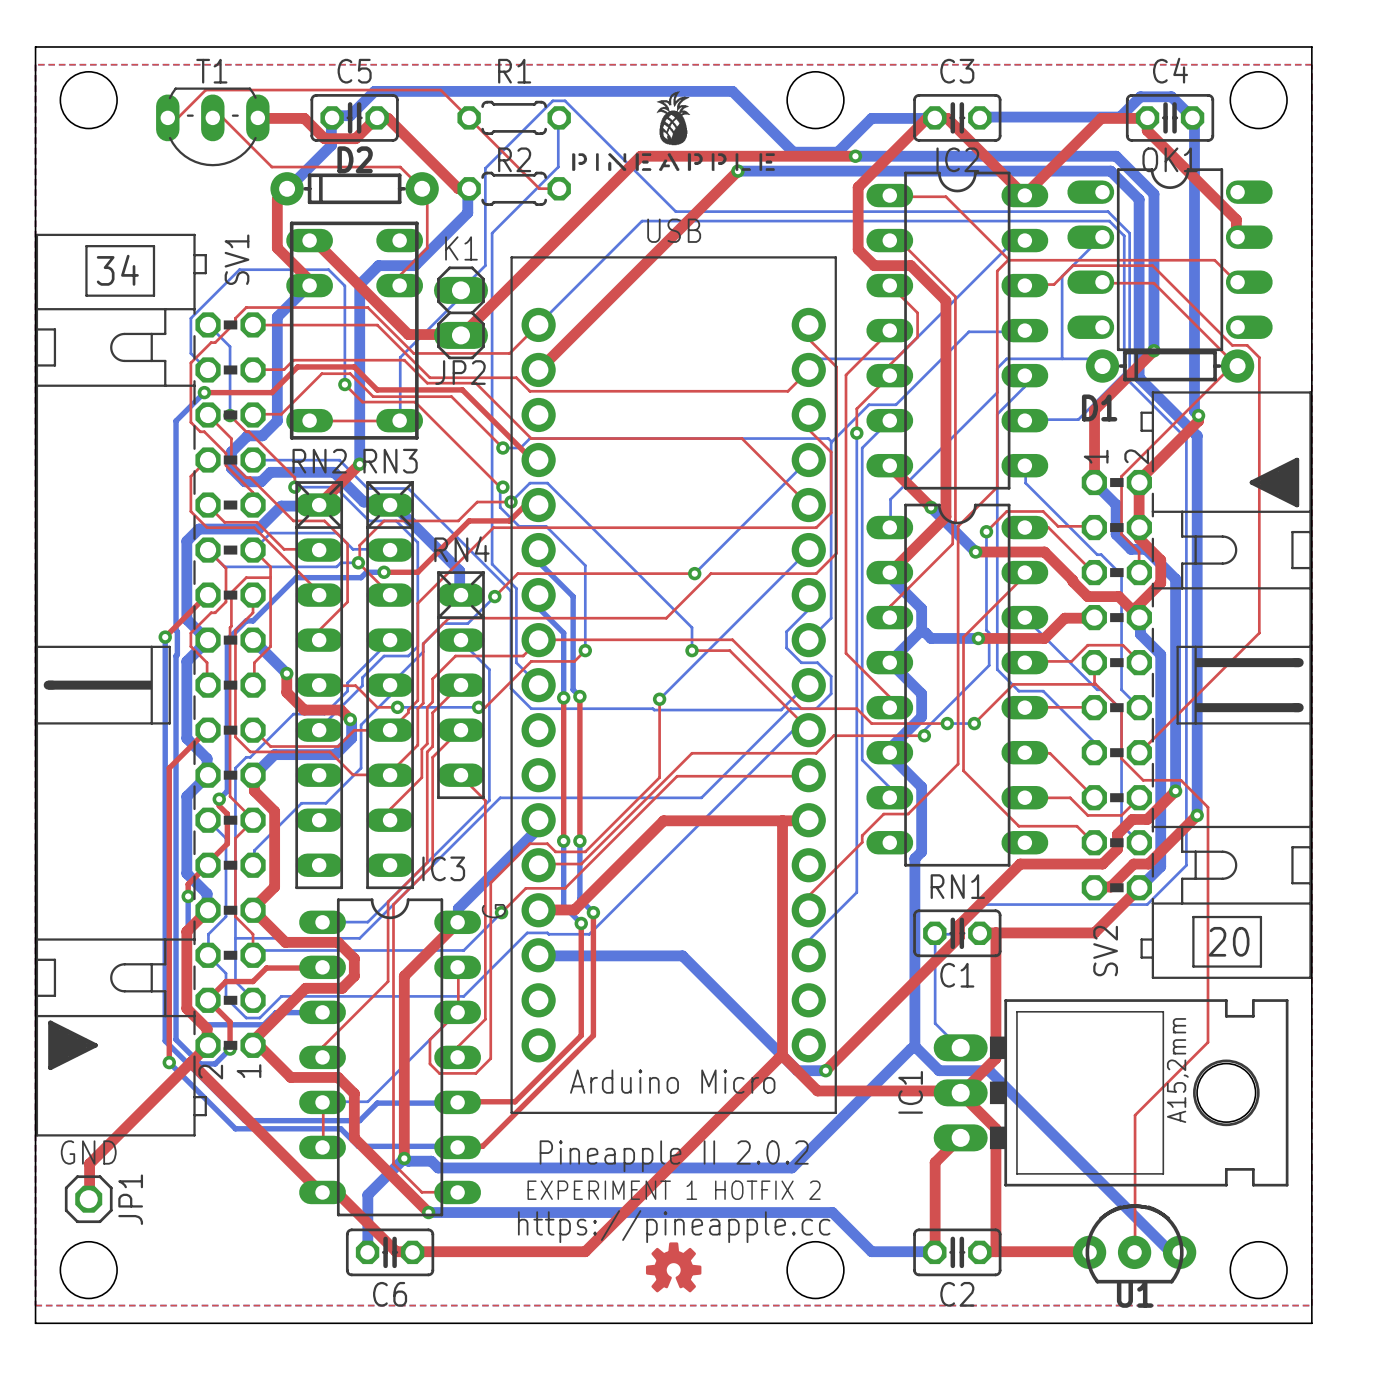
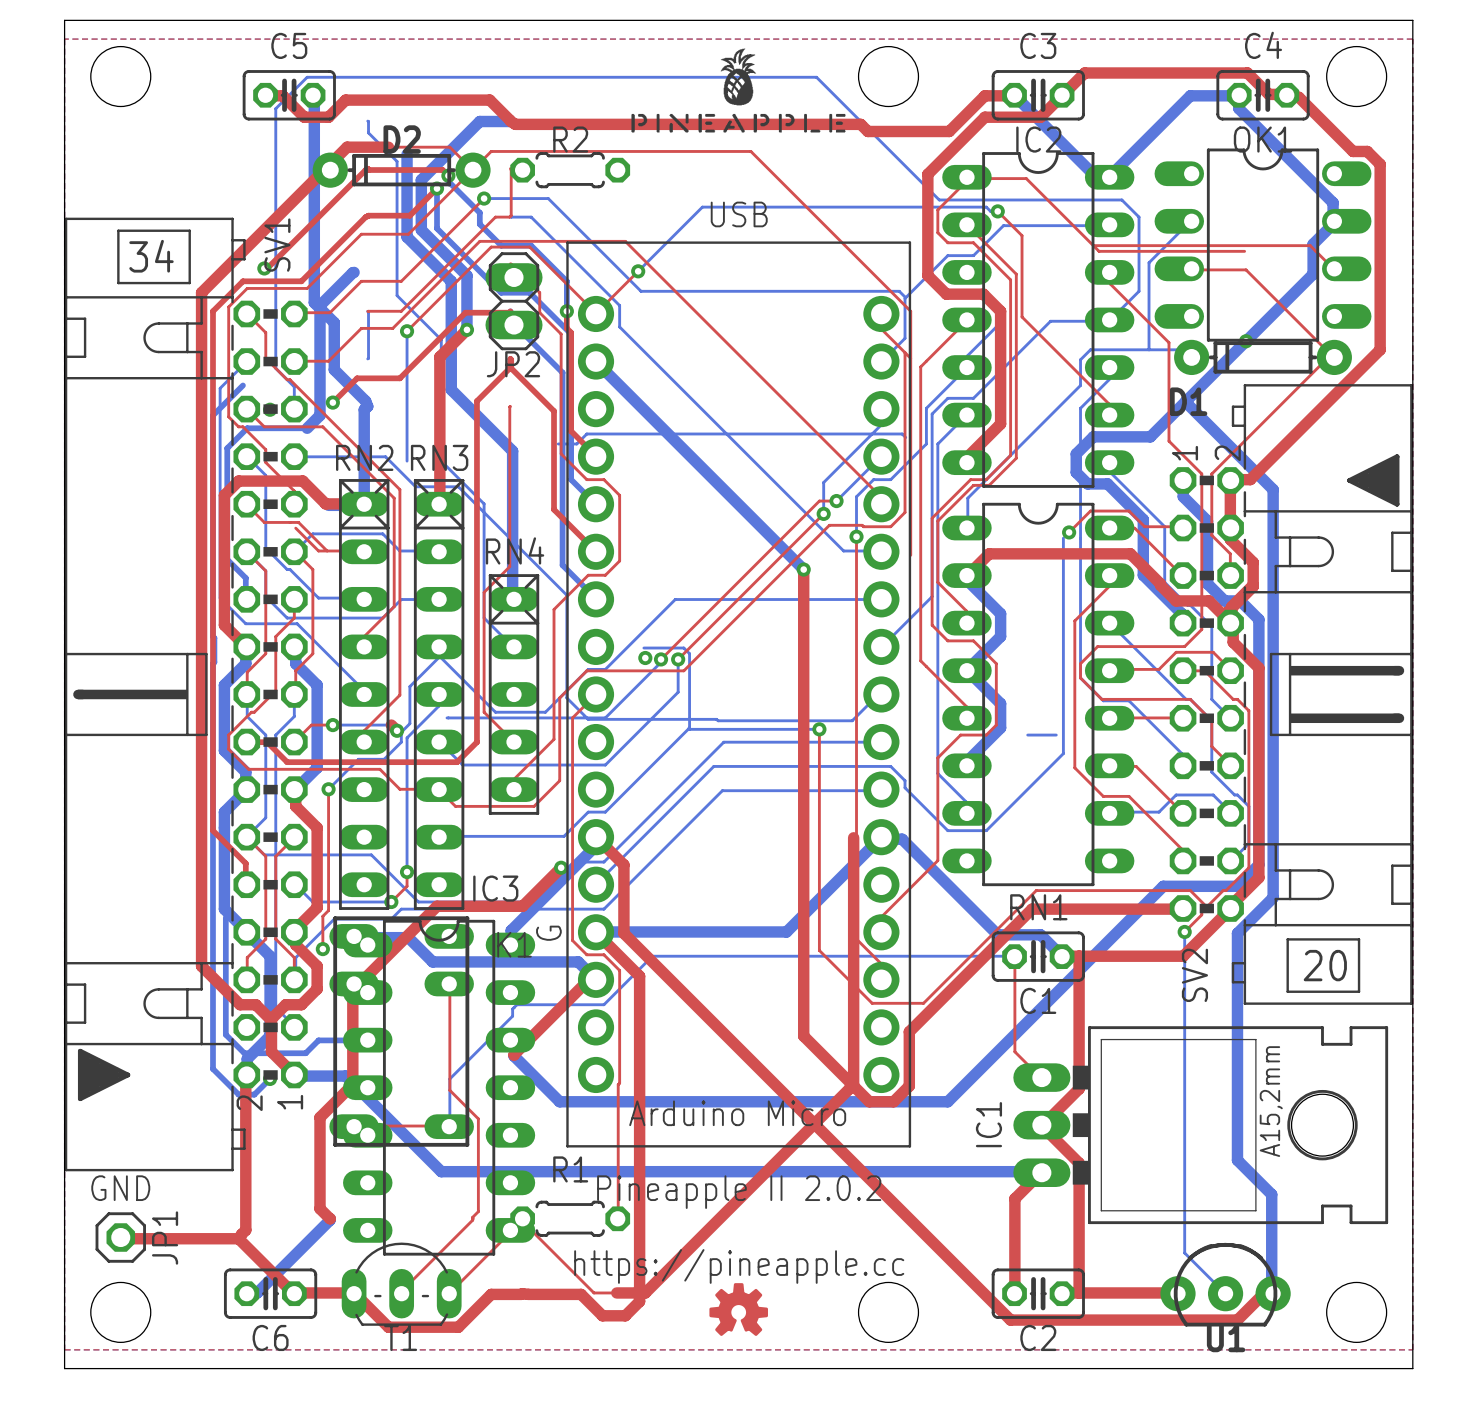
bottom track: (552, 100) (485, 168) (485, 265) (459, 291) (459, 298) (400, 357) (399, 420) -> (611, 77) (307, 77) (275, 108) (275, 368) (294, 386) (294, 409)
bottom track: (565, 100) (675, 211) (1108, 211) (1129, 233) (1129, 381) (1186, 438) (1186, 865) (1147, 904) (985, 904) (955, 934) (934, 933) (935, 1023) (960, 1047) -> (623, 77) (816, 77) (939, 199) (1121, 199) (1139, 217) (1139, 291) (1109, 319)
top track: (167, 117) (178, 117) (205, 90) (440, 90) (539, 188) (559, 188) -> none
top track: (212, 117) (223, 118) (271, 167) (302, 167) -> (294, 1074) (271, 1051) (271, 1020) (255, 1004) (240, 1004) (201, 966) (201, 292) (347, 147)
top track: none -> (265, 95) (282, 95) (304, 117) (328, 117) (345, 100) (489, 100) (515, 124) (860, 124) (867, 131) (949, 131) (984, 95) (1014, 95)
top track: (257, 117) (304, 118) (324, 138) (355, 138) (375, 118) (388, 118) (458, 188) (469, 188) -> none
bottom track: none -> (313, 95) (314, 302) (334, 322) (334, 369) (365, 401) (367, 406) (364, 409) (364, 503)
C5 position: (354, 117) -> (289, 95)
R1 position: (514, 117) -> (570, 1218)
bottom track: (559, 117) (558, 167) (492, 233) (492, 564) (516, 588) (516, 662) (538, 685) -> none
bottom track: (934, 117) (871, 118) (837, 152) (793, 152) (732, 91) (374, 91) (350, 115) (336, 115) (331, 118) (331, 145) (287, 188) -> (1014, 95) (1096, 177) (1109, 177) (1190, 95) (1239, 95) (1238, 108) (1333, 202) (1334, 221) (1313, 244) (1313, 274) (1150, 436) (1093, 436) (1076, 453) (1076, 472) (1087, 483) (1107, 483) (1143, 519) (1143, 575) (1181, 613) (1183, 623)
bottom track: (979, 117) (1120, 117) (1140, 96) (1171, 96) (1192, 117) (1194, 122) (1194, 411) (1198, 415) -> none
T1 rotation: 0° (212, 126) -> 180° (401, 1284)
T1 position: (212, 126) -> (401, 1284)
drawing position: (673, 131) -> (738, 90)
top track: (906, 138) (925, 119) (947, 118) (1024, 195) (1101, 118) (1147, 117) (1147, 130) (1236, 219) (1237, 237) -> (984, 117) (1040, 117) (1084, 72) (1247, 72) (1268, 94) (1285, 94) (1291, 97) (1298, 97) (1353, 151) (1367, 151) (1380, 164) (1380, 349) (1250, 479) (1230, 480)
bottom track: none -> (510, 121) (479, 121) (421, 180) (421, 229) (466, 275) (466, 329)
top track: (855, 156) (640, 156) (460, 335) (408, 334) (315, 241) (309, 240) -> none
bottom track: (855, 156) (1116, 156) (1153, 194) (1153, 350) -> none
via: (855, 156) -> none
top track width: thin (302, 167) (342, 167) -> thick (347, 147) (388, 147)
top track: (737, 171) (538, 369) -> none
bottom track: (737, 171) (1110, 171) (1139, 199) (1139, 377) (1197, 435) (1197, 815) -> none
via: (737, 171) -> none
bottom track: none -> (407, 154) (407, 237) (451, 281) (451, 389) (512, 451) (512, 573)
top track: none -> (510, 168) (511, 215) (495, 217) (401, 311) (367, 311)
top track: (858, 187) (858, 249) (874, 265) (910, 265) (945, 300) (945, 516) (910, 552) -> (933, 168) (927, 174) (927, 275) (946, 294) (983, 294) (1000, 311) (1000, 424) (967, 456) (966, 462)
top track: (287, 188) (277, 199) (277, 248) (308, 279) (309, 285) -> none
top track: (422, 188) (427, 194) (427, 248) (400, 275) (399, 285) -> none
bottom track: (469, 188) (467, 212) (415, 265) (378, 265) (359, 284) (359, 341) -> none
top track: none -> (448, 175) (442, 170) (367, 168) (267, 268) (264, 268)
bottom track: none -> (448, 175) (448, 181) (479, 212) (479, 224) (501, 245) (531, 245) (566, 281) (566, 311)
via: none -> (448, 175)
top track: none -> (437, 188) (409, 215) (365, 217) (301, 281) (242, 281) (212, 311) (212, 830) (245, 863) (246, 884)
bottom track: none -> (437, 188) (437, 228) (501, 292) (529, 292) (571, 334) (571, 479) (596, 504)
via: none -> (437, 188)
bottom track: none -> (484, 198) (548, 198) (641, 291) (899, 291) (905, 297)
via: none -> (484, 198)
bottom track: (639, 223) (642, 221) (1109, 221) (1124, 235) (1124, 373) (1078, 419) (1024, 420) -> (702, 207) (986, 207) (990, 211) (997, 211)
top track: none -> (997, 211) (1022, 235) (1022, 316) (1109, 404) (1109, 415)
via: none -> (997, 211)
top track: (890, 241) (900, 241) (955, 296) (955, 520) (952, 523) (952, 543) (890, 606) (889, 617) -> (967, 225) (1016, 274) (1016, 458) (989, 485) (973, 485) (937, 521) (937, 582) (966, 610) (966, 623)
bottom track: (1013, 241) (917, 337) -> (1097, 225) (1003, 225) (973, 255) (947, 255) (905, 298) (905, 338) (893, 349)
top track: (1008, 259) (997, 271) (997, 487) (958, 526) (958, 764) (908, 814) (883, 814) (862, 835) -> none
top track: (1072, 265) (1054, 284) (1024, 285) -> (1160, 251) (1099, 251) (1093, 245)
top track: (1152, 265) (1232, 345) (1247, 345) (1259, 357) (1259, 633) (1139, 752) -> (1211, 746) (1230, 765)
via: none -> (264, 268)
top track: none -> (638, 271) (596, 313) (529, 247) (491, 247) (407, 331)
bottom track: (578, 284) (538, 324) -> none
via: none -> (638, 271)
top track: (889, 285) (917, 312) (917, 337) (890, 364) (890, 375) (856, 408) (856, 433) -> none
top track: none -> (1109, 272) (1110, 284) (1168, 342) (1168, 441) (1201, 473) (1201, 629) (1184, 646) (1097, 646) (1080, 663) (1080, 677) (1101, 699) (1190, 699)
bottom track: none -> (367, 311) (367, 358)
top track: none -> (510, 311) (465, 312) (399, 378) (357, 378) (332, 402)
via: none -> (566, 311)
top track: none -> (246, 313) (265, 332) (265, 358) (287, 379) (290, 379) (399, 489) (399, 695) (364, 730) (364, 742)
bottom track: (208, 324) (230, 346) (230, 415) -> none
top track: (253, 324) (377, 325) (429, 377) (516, 377) (529, 391) (787, 391) (808, 369) -> (294, 313) (329, 312) (361, 281) (401, 281) (484, 198)
top track: (538, 324) (509, 353) (413, 353) (367, 307) (246, 307) (235, 318) (235, 322) (215, 342) (211, 342) (190, 362) -> (910, 358) (910, 311) (750, 151) (491, 151) (408, 234) (361, 234) (307, 288) (247, 288) (228, 307) (228, 354)
K1 position: (354, 330) -> (401, 1031)
top track: none -> (466, 329) (439, 356) (439, 504)
via: none -> (466, 329)
bottom track width: thick (359, 341) (359, 464) -> thin (407, 331) (407, 461)
via: none -> (407, 331)
top track: (1153, 350) (1094, 410) (1094, 482) -> none
bottom track: (820, 358) (895, 358) -> (856, 536) (856, 496) (873, 479) (890, 479) (926, 443) (926, 408) (967, 366) (967, 355) (973, 349)
bottom track: (208, 369) (190, 353) (190, 318) (239, 269) (328, 269) (344, 285) (344, 384) -> (246, 361) (220, 388) (220, 598) (245, 623) (297, 623) (362, 689) (364, 694)
top track: (284, 369) (293, 360) (404, 360) (427, 383) (475, 383) (531, 438) (741, 438) (808, 504) -> (327, 361) (361, 328) (392, 328) (479, 241) (625, 241) (880, 496) (880, 503)
bottom track: none -> (596, 361) (803, 569)
top track: (344, 384) (362, 402) (415, 402) (500, 487) (502, 487) -> none
via: (344, 384) -> none
top track: (204, 392) (271, 392) (297, 366) (354, 366) (377, 389) (462, 389) (531, 458) (538, 458) -> (566, 311) (566, 328) (571, 332) (571, 431) (595, 455)
via: (204, 392) -> none
bottom track: (871, 404) (868, 404) (831, 442) (831, 618) -> (947, 398) (932, 414) (932, 428)
via: none -> (332, 402)
top track: (253, 414) (281, 414) (321, 373) (350, 373) (373, 396) (451, 396) (502, 448) -> none
top track: (808, 414) (809, 430) (831, 452) -> (905, 352) (905, 448)
bottom track: none -> (881, 409) (880, 425) (823, 482) (823, 513)
top track: (230, 415) (246, 431) -> (264, 426) (287, 426)
top track: (1198, 415) (1198, 420) (1141, 477) (1139, 482) -> none
via: (1198, 415) -> none
top track: (309, 420) (399, 420) -> none
top track: (224, 431) (231, 438) (231, 462) (246, 477) (250, 477) (293, 520) (324, 520) (347, 543) -> (290, 426) (322, 426) (394, 498) (394, 545)
top track: (248, 431) (294, 477) (294, 487) -> none
bottom track: (265, 433) (262, 435) (247, 435) (231, 452) (231, 468) (244, 481) (261, 481) (270, 472) (334, 472) (363, 502) (385, 502) (390, 506) (394, 506) (459, 570) -> (307, 428) (247, 428) (227, 448) (227, 559) (245, 578) (246, 599)
via: (856, 433) -> none
via: (502, 448) -> none
top track: (208, 460) (190, 476) (190, 511) (207, 527) (254, 527) -> none
top track: (359, 464) (319, 504) -> (246, 646) (224, 625) (224, 495) (238, 481) (302, 481) (325, 503) (364, 504)
via: (359, 464) -> none
top track: (889, 465) (931, 507) -> none
bottom track: (1025, 475) (1025, 483) (1097, 554) (1101, 554) (1121, 574) (1121, 620) -> (1110, 472) (1164, 526) (1164, 582) (1211, 626)
bottom track: (1094, 483) (1116, 504) (1116, 534) (1131, 549) (1145, 549) (1175, 579) (1175, 791) -> (1183, 481) (1183, 496) (1207, 521) (1207, 583) (1224, 600) (1240, 600) (1258, 619) (1258, 864) (1237, 886) (1163, 886) (947, 1101) (899, 1101)
bottom track: (294, 487) (335, 487) (369, 520) (396, 520) (417, 542) (417, 646) (408, 656) (384, 656) -> (439, 656) (432, 663)
via: (294, 487) -> none
bottom track: (502, 487) (500, 489) (500, 507) (519, 526) (546, 526) (585, 565) (585, 650) -> none
via: (502, 487) -> none
top track: (511, 502) (477, 502) (458, 520) (384, 520) (359, 545) (358, 562) (390, 595) -> none
bottom track: (511, 502) (529, 483) (547, 483) (692, 627) (692, 650) -> none
via: (511, 502) -> none
top track: none -> (836, 501) (819, 501) (661, 659)
bottom track: (766, 502) (694, 573) -> none
via: none -> (836, 501)
top track: (538, 505) (524, 506) (509, 520) (469, 520) (417, 572) (384, 572) -> none
bottom track: (281, 506) (258, 529) (198, 529) (186, 541) (186, 619) (208, 640) (186, 661) (186, 676) -> (246, 646) (245, 663) (224, 685)
bottom track: (931, 507) (975, 552) -> none
via: (931, 507) -> none
top track: none -> (823, 513) (678, 659)
via: none -> (823, 513)
top track: (817, 526) (493, 527) (456, 564) -> (510, 406) (509, 566)
bottom track: (986, 531) (986, 630) (989, 633) (989, 665) (924, 730) (924, 735) -> none
top track: none -> (856, 536) (856, 939) (880, 963) (881, 979)
via: none -> (856, 536)
bottom track: none -> (1063, 538) (1063, 753) (986, 830) (947, 830) (905, 787) (905, 780) (890, 766) (713, 766) (596, 884)
top track: (275, 549) (317, 591) (319, 595) -> (318, 550) (327, 550)
bottom track: (538, 550) (539, 562) (573, 596) (573, 689) (579, 696) -> none
bottom track: (808, 550) (659, 699) -> (881, 551) (843, 550) (619, 326) (619, 305) (531, 217) (510, 216)
top track: none -> (989, 553) (1057, 553)
via: (975, 552) -> none
top track: (836, 553) (816, 573) (710, 573) -> (890, 526) (829, 525) (778, 576)
bottom track: (358, 562) (340, 562) (336, 566) (248, 566) -> (364, 599) (318, 598) (290, 569)
via: (358, 562) -> none
bottom track: (224, 566) (246, 566) -> (246, 456) (265, 475) (265, 548) (287, 569)
bottom track: none -> (264, 569) (265, 596) (287, 618) (382, 618) (401, 599) (439, 599)
top track: none -> (803, 569) (803, 1036) (853, 1086)
bottom track: (384, 572) (366, 572) (361, 577) (296, 577) (253, 620) (246, 620) (227, 639) (227, 791) (219, 799) -> none
via: (384, 572) -> none
top track: (694, 573) (517, 573) (494, 596) -> none
via position: (694, 573) -> (803, 569)
top track: (1024, 576) (963, 637) (963, 770) (1018, 826) (1076, 826) (1093, 842) -> (1109, 579) (1109, 586) (1074, 620) (1074, 767) (1103, 796) (1129, 796) (1181, 849) (1181, 860)
top track: (270, 577) (246, 577) (231, 592) (230, 796) (253, 820) -> none
top track: none -> (1253, 585) (1231, 606) (1230, 623) (1233, 628) (1233, 642) (1258, 667) (1258, 877) (1233, 903) (1230, 908)
top track: (432, 588) (417, 603) (417, 700) (390, 730) (354, 730) (338, 746) (270, 746) (253, 730) -> (484, 592) (484, 687)
bottom track: (856, 592) (856, 892) (809, 939) (808, 955) -> (932, 596) (905, 623)
top track: (208, 595) (165, 637) -> none
bottom track: (538, 595) (539, 608) (563, 633) (563, 697) -> (596, 599) (562, 565) (562, 372) (511, 321) (510, 311)
bottom track: (808, 595) (808, 610) (786, 631) (786, 647) (801, 662) (817, 662) (831, 676) (831, 693) (816, 708) (790, 708) (701, 797) (500, 797) (359, 938) (235, 938) -> (880, 599) (675, 599) (605, 669) (588, 669) (545, 712) (495, 712) (439, 656)
bottom track: (494, 596) (467, 623) (443, 623) (423, 643) (423, 651) (390, 685) -> none
via: (494, 596) -> none
top track: (226, 601) (215, 612) (211, 612) (190, 633) (190, 646) (207, 662) (208, 685) -> (265, 606) (265, 653) (247, 672) (246, 694)
top track: (1094, 617) (1064, 618) (1044, 638) (978, 638) -> none
bottom track: (1139, 617) (1140, 634) (1160, 654) (1160, 866) (1139, 887) -> none
top track: (666, 618) (448, 618) (423, 643) (423, 703) (417, 708) (417, 745) (389, 773) (390, 775) -> none
bottom track: (921, 630) (931, 638) (978, 638) -> none
bottom track: (165, 637) (165, 1040) (244, 1120) (359, 1120) (377, 1103) (457, 1102) -> none
via: (165, 637) -> none
via: (978, 638) -> none
bottom track: (390, 640) (347, 683) (347, 691) (324, 714) -> (391, 725) (369, 725)
bottom track: (460, 640) (489, 669) (489, 800) (367, 922) (322, 922) -> (514, 646) (484, 618) (484, 503) (441, 461) (441, 339) (397, 295) (397, 161) (368, 132) (367, 121)
bottom track: (254, 641) (286, 673) -> (295, 648) (295, 663) (317, 685) (317, 767)
bottom track: none -> (643, 648) (683, 648) (689, 653) (689, 727) (605, 812) (588, 812) (564, 836) (439, 837)
top track: (585, 650) (574, 661) (529, 662) -> (730, 623) (683, 670) (586, 670)
top track: (692, 650) (729, 650) (808, 730) -> none
via: (692, 650) -> none
bottom track: none -> (661, 659) (661, 662) (605, 717) (532, 717)
via: none -> (661, 659)
bottom track: none -> (678, 659) (678, 692) (605, 765) (462, 765) (439, 742)
via: none -> (678, 659)
top track: (1094, 662) (1094, 683) (1101, 689) -> (1183, 670) (1204, 670) (1233, 699) (1237, 699) (1248, 710) (1248, 867) (1226, 890) (1223, 890) (1184, 931)
top track: (286, 673) (286, 692) (304, 710) (340, 710) (344, 714) -> none
via position: (286, 673) -> (332, 725)
top track: (432, 678) (455, 656) (523, 656) (539, 639) (732, 639) (801, 708) (856, 708) (871, 723) (883, 723) -> (937, 853) (937, 757) (960, 735)
top track: (235, 681) (235, 737) (250, 751) (330, 751) (334, 755) -> (275, 690) (228, 735) (228, 749) (248, 769) (379, 769)
top track: (1095, 683) (1013, 684) (974, 723) -> none
bottom track: none -> (246, 694) (247, 716) (265, 735) (265, 817) (246, 837)
top track: (319, 685) (355, 685) (377, 707) (397, 707) -> none
bottom track: (362, 685) (319, 730) -> (409, 695) (409, 723) (401, 732) (401, 742) (384, 759) (358, 759) (328, 789)
top track: (460, 685) (432, 712) (432, 746) (427, 751) (427, 862) (388, 901) (388, 981) (323, 1046) (322, 1057) -> none
top track: none -> (596, 694) (572, 717) (572, 940) (586, 954) (603, 954) (619, 970) (617, 1218)
top track: (504, 688) (485, 707) (478, 707) -> (559, 697) (559, 780) (534, 806) (455, 806) (439, 789)
top track: (579, 696) (579, 841) -> none
via: (579, 696) -> none
top track: (563, 697) (563, 841) -> none
via: (563, 697) -> none
top track: (659, 699) (659, 777) (585, 851) (555, 851) (547, 843) (529, 843) (490, 882) (490, 1058) (475, 1073) (439, 1073) (429, 1063) (429, 1039) (458, 1011) (457, 967) -> none
via: (659, 699) -> none
top track: (432, 701) (427, 707) (427, 743) (421, 749) (421, 777) (390, 808) (390, 820) -> (484, 712) (514, 742)
via: (397, 707) -> none
via: (478, 707) -> none
top track: none -> (332, 725) (311, 725) (294, 742)
bottom track: (293, 714) (250, 757) (246, 757) (235, 768) -> (294, 694) (294, 716) (275, 735) (275, 782)
bottom track: none -> (688, 728) (819, 729)
top track: none -> (819, 729) (819, 950) (872, 1003) (923, 1003) (1036, 890) (1190, 890) (1206, 906)
via: none -> (819, 729)
bottom track: (350, 719) (351, 738) (335, 754) (274, 754) -> none
top track: (908, 723) (947, 723) -> (986, 735) (996, 725) (996, 663) (973, 640) (947, 640) (932, 625) (932, 518) (970, 479) (986, 479) (1010, 455) (1010, 279) (973, 242) (947, 242) (937, 232) (937, 209) (967, 180) (966, 177)
via: (947, 723) -> none
via: (974, 723) -> none
bottom track: (361, 724) (361, 768) (325, 803) (301, 803) (254, 850) (253, 865) -> (408, 736) (407, 872)
top track: (208, 730) (169, 768) (169, 1062) -> (246, 742) (267, 742) (287, 762) (456, 762) (476, 742) (476, 401) (509, 368) (510, 358) (511, 368) (554, 411) (554, 509) (596, 551)
top track: (460, 730) (432, 757) (432, 865) (393, 904) (393, 1163) (421, 1192) (457, 1192) -> none
bottom track: (793, 730) (589, 934) (527, 932) (463, 996) (281, 996) (259, 1018) (246, 1018) (226, 997) (226, 973) (208, 955) (208, 934) (226, 916) (224, 837) -> (865, 742) (723, 742) (603, 862) (583, 862) (544, 902) (418, 902) (371, 854) (264, 854)
top track: (1121, 734) (1121, 758) (1143, 780) (1180, 780) (1208, 807) (1208, 1042) (1135, 1115) (1134, 1252) -> none
top track: (924, 735) (833, 735) (816, 753) (692, 753) (581, 864) (538, 865) -> none
via: (924, 735) -> none
bottom track: (889, 752) (891, 757) (921, 787) (921, 851) (914, 858) (914, 1046) -> none
bottom track: (1121, 758) (1121, 824) (1139, 842) -> (1211, 772) (1248, 806) (1248, 843) (1230, 860)
top track: none -> (328, 789) (328, 910) (322, 916) (322, 949)
via: none -> (328, 789)
top track: (460, 775) (485, 800) (485, 1019) (458, 1046) (457, 1057) -> (514, 789) (514, 779) (554, 739) (554, 609) (588, 575) (605, 575) (619, 560) (619, 495) (603, 479) (586, 479) (561, 453) (561, 334) (539, 312) (539, 292) (510, 263)
top track: (808, 775) (677, 776) (565, 888) (525, 888) (501, 912) -> none
top track: (1175, 791) (1147, 819) (1132, 819) (1117, 834) (1117, 849) (1102, 864) (1020, 864) (959, 924) (959, 936) (825, 1070) -> none
via: (1175, 791) -> none
top track: (1024, 797) (1070, 797) (1087, 815) (1121, 815) (1139, 797) -> none
bottom track: none -> (1109, 813) (1159, 812) (1176, 794) (1213, 794) (1230, 813)
top track: (219, 799) (219, 805) (227, 814) (227, 843) (188, 884) (188, 896) -> none
via: (219, 799) -> none
top track: (1197, 815) (1148, 864) (1133, 864) (1110, 887) (1094, 887) -> none
via: (1197, 815) -> none
top track: none -> (246, 837) (265, 856) (265, 939) (247, 957) (246, 979)
top track: none -> (596, 837) (623, 864) (623, 933) (1010, 1320) (1237, 1320) (1263, 1294) (1273, 1293)
top track: (808, 820) (663, 820) (574, 909) (538, 910) -> (238, 1238) (294, 1293) (352, 1292) (388, 1327) (458, 1327) (491, 1294) (581, 1294) (602, 1315) (625, 1315) (639, 1301) (639, 976) (596, 932)
bottom track: (563, 841) (563, 905) (581, 923) -> none
via: (563, 841) -> none
bottom track: (579, 841) (579, 899) (593, 912) -> none
via: (579, 841) -> none
top track: none -> (561, 867) (522, 906) (437, 906) (359, 983) (352, 984) (352, 1084) (320, 1117) (320, 1208) (329, 1218)
via: none -> (561, 867)
top track: none -> (407, 872) (407, 886) (391, 902)
via: none -> (407, 872)
bottom track: none -> (294, 884) (312, 902) (391, 902)
bottom track: (186, 873) (207, 893) (208, 910) -> (224, 893) (224, 909) (270, 956) (270, 1036) (247, 1058) (246, 1074)
via: none -> (391, 902)
via: (188, 896) -> none
bottom track: none -> (1184, 931) (1184, 1253) (1225, 1293)
via: none -> (1184, 931)
top track: (208, 910) (186, 931) (186, 1008) (207, 1028) (208, 1045) (89, 1163) (88, 1199) -> (238, 1238) (120, 1237)
bottom track: none -> (596, 932) (786, 931) (881, 837) (886, 839) (902, 839) (997, 934) (1040, 934) (1062, 956)
top track: (254, 911) (285, 942) (338, 942) (354, 958) (354, 976) (342, 988) (305, 988) (254, 1039) (253, 1045) (259, 1046) (290, 1077) (338, 1077) (354, 1093) (354, 1138) (428, 1212) -> (295, 933) (295, 944) (317, 966) (317, 989) (301, 1004) (285, 1004) (270, 1019)
bottom track: (501, 912) (463, 950) (258, 950) (254, 954) -> (881, 789) (722, 790) (603, 909) (401, 909) (391, 919) (334, 919) (295, 957) (295, 979)
via: (501, 912) -> none
top track: (593, 912) (593, 1035) (482, 1146) (457, 1147) -> none
via: (593, 912) -> none
bottom track: none -> (354, 936) (408, 937) (432, 961) (578, 961) (596, 979)
top track: (457, 922) (404, 976) (404, 1158) -> none
top track: (581, 923) (581, 1035) (515, 1101) (457, 1102) -> none
via: (581, 923) -> none
via: none -> (322, 949)
top track: none -> (1014, 956) (1014, 1051) (1041, 1077)
bottom track: none -> (1014, 956) (652, 956) (603, 1004) (516, 1004) (514, 1007)
top track: none -> (596, 979) (588, 980) (514, 1055)
bottom track: (538, 955) (682, 955) (797, 1070) -> (514, 1055) (559, 1101) (869, 1101)
top track: none -> (449, 983) (449, 1090) (478, 1118) (478, 1211) (472, 1217) (472, 1220) (402, 1290) (401, 1293)
top track: (322, 967) (266, 968) (253, 981) (226, 981) (208, 1000) (230, 1022) (230, 1049) -> none
bottom track: none -> (514, 1007) (512, 1016) (449, 1078) (449, 1126)
bottom track: (457, 1012) (367, 1101) (322, 1102) -> none
top track: none -> (246, 1074) (245, 1230) (238, 1238)
bottom track: none -> (294, 1074) (345, 1076) (441, 1171) (1041, 1172)
bottom track: (914, 1046) (939, 1070) (989, 1070) (1170, 1251) (1178, 1251) -> (1185, 401) (1273, 489) (1273, 897) (1237, 933) (1237, 1160) (1271, 1194) (1271, 1292)
bottom track: (914, 1046) (791, 1167) (438, 1167) (431, 1161) (408, 1161) (404, 1158) (367, 1194) (367, 1252) -> none
bottom track: (169, 1062) (235, 1128) (340, 1128) (358, 1146) (457, 1147) -> none
via: (169, 1062) -> none
top track: (190, 1062) (317, 1189) (323, 1193) (338, 1193) (396, 1251) (536, 1251) -> (449, 1293) (522, 1218) (522, 1221) (593, 1292)
top track: (797, 1070) (817, 1090) (955, 1090) (960, 1092) -> (869, 1101) (893, 1101) (909, 1086) (909, 1031) (1032, 909) (1183, 908)
via: (825, 1070) -> none
top track: none -> (354, 1126) (449, 1126)
top track: (322, 1102) (322, 1147) -> none
via: (404, 1158) -> none
bottom track: none -> (330, 1218) (257, 1292) (246, 1293)
text: EXPERIMENT 1 HOTFIX 2 (674, 1190) -> none
bottom track: (428, 1212) (832, 1212) (871, 1251) (934, 1252) -> none
via: (428, 1212) -> none
top track width: thick (536, 1251) (558, 1251) -> thin (593, 1292) (616, 1292)
C6 position: (390, 1252) -> (270, 1293)

